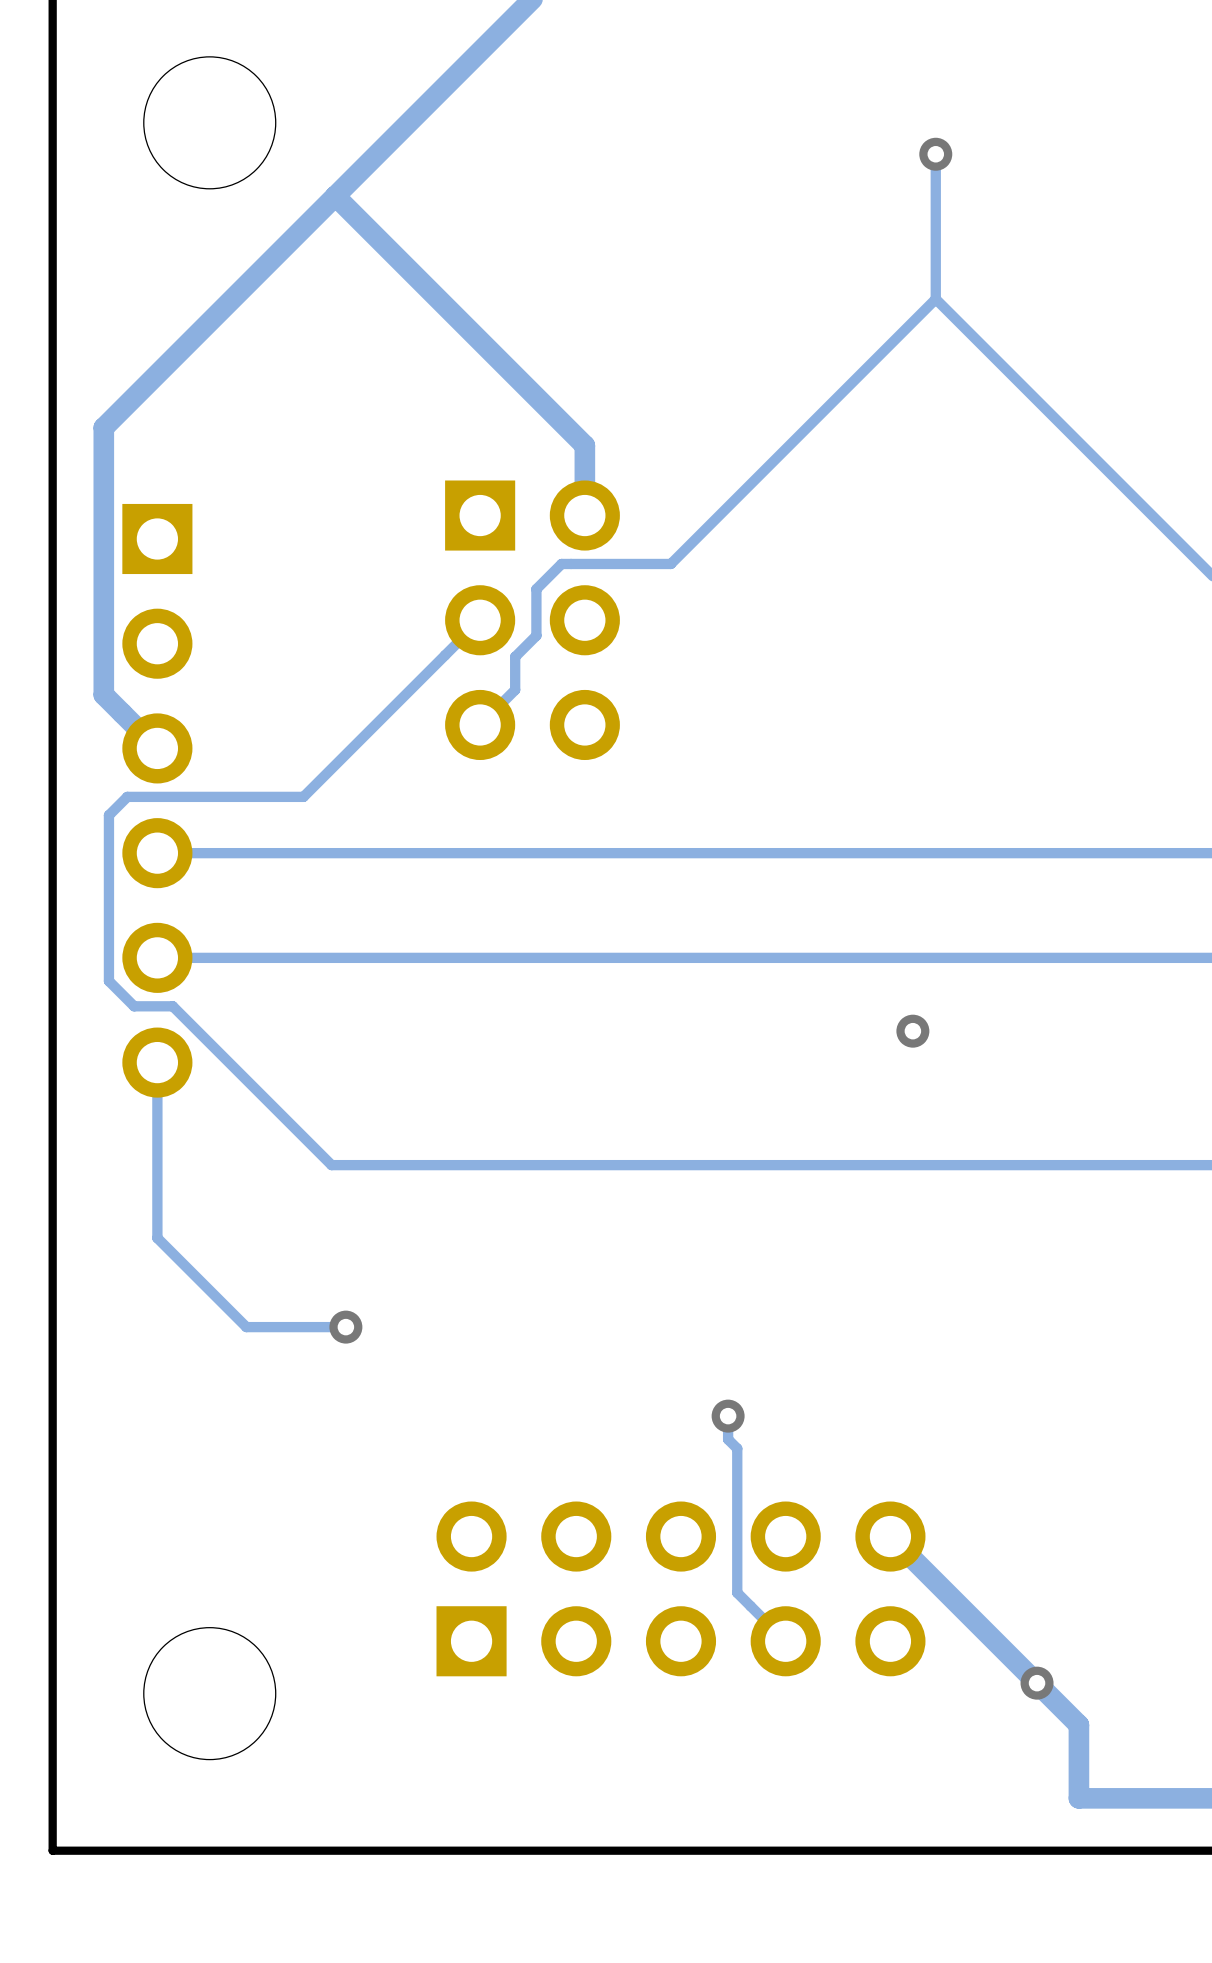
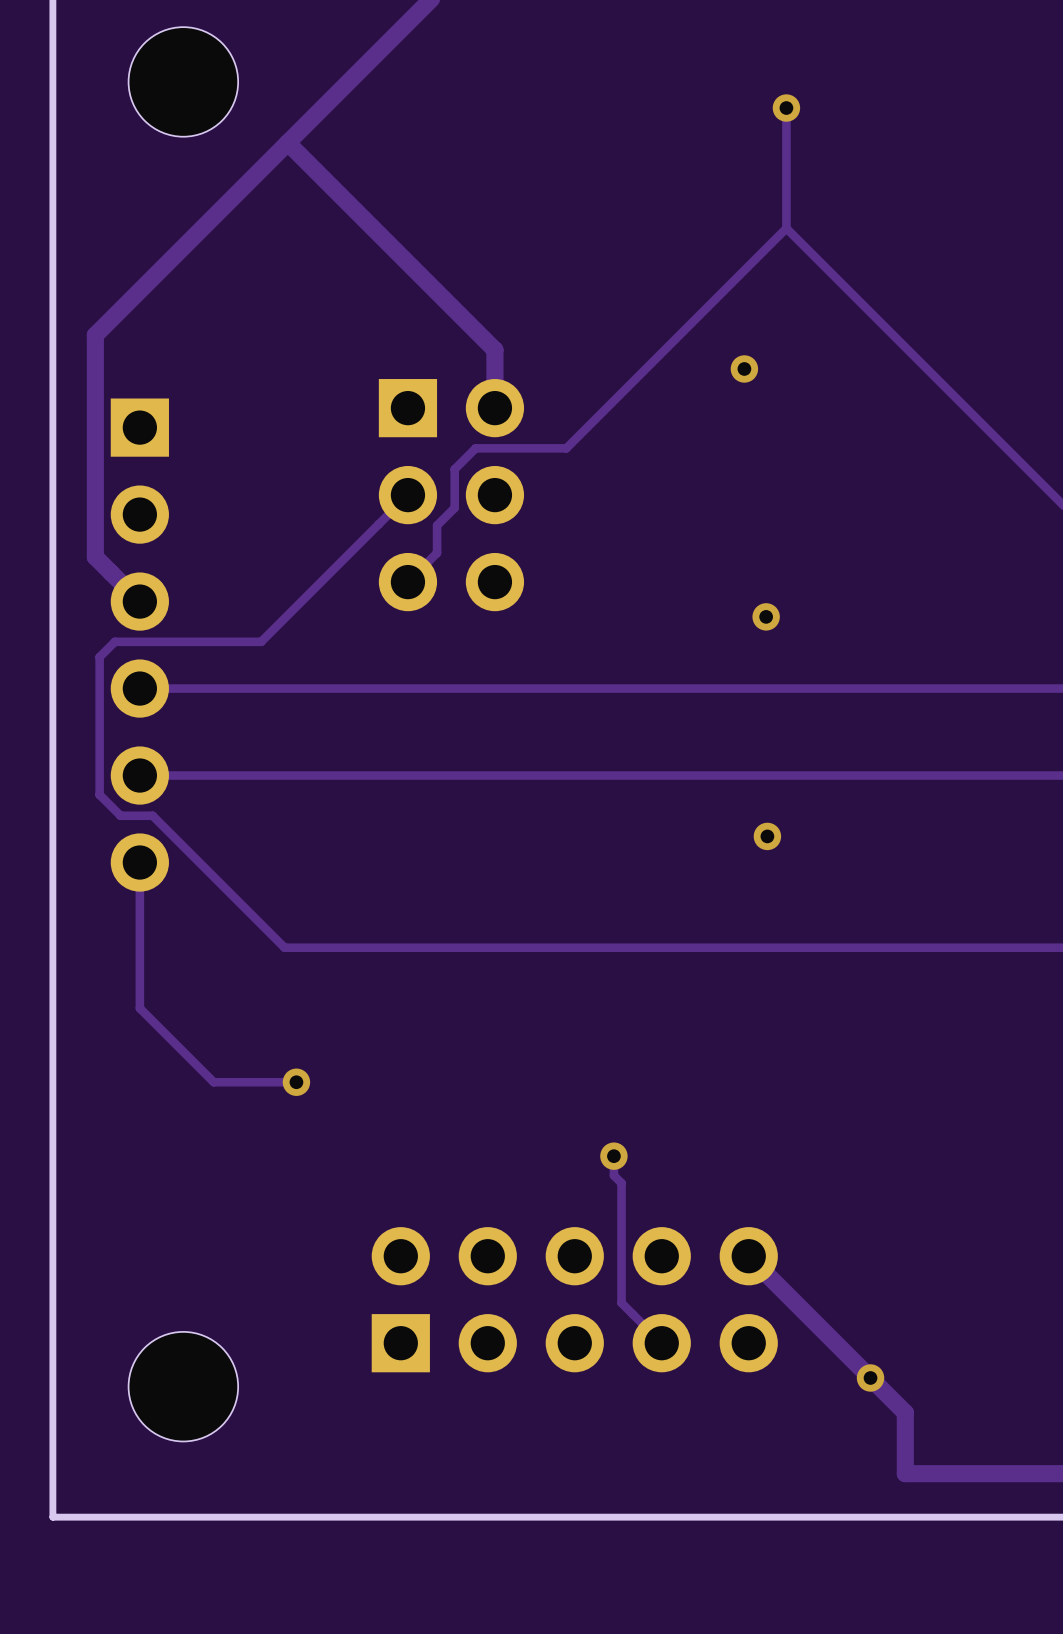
via: none -> (744, 368)
via: none -> (766, 616)

